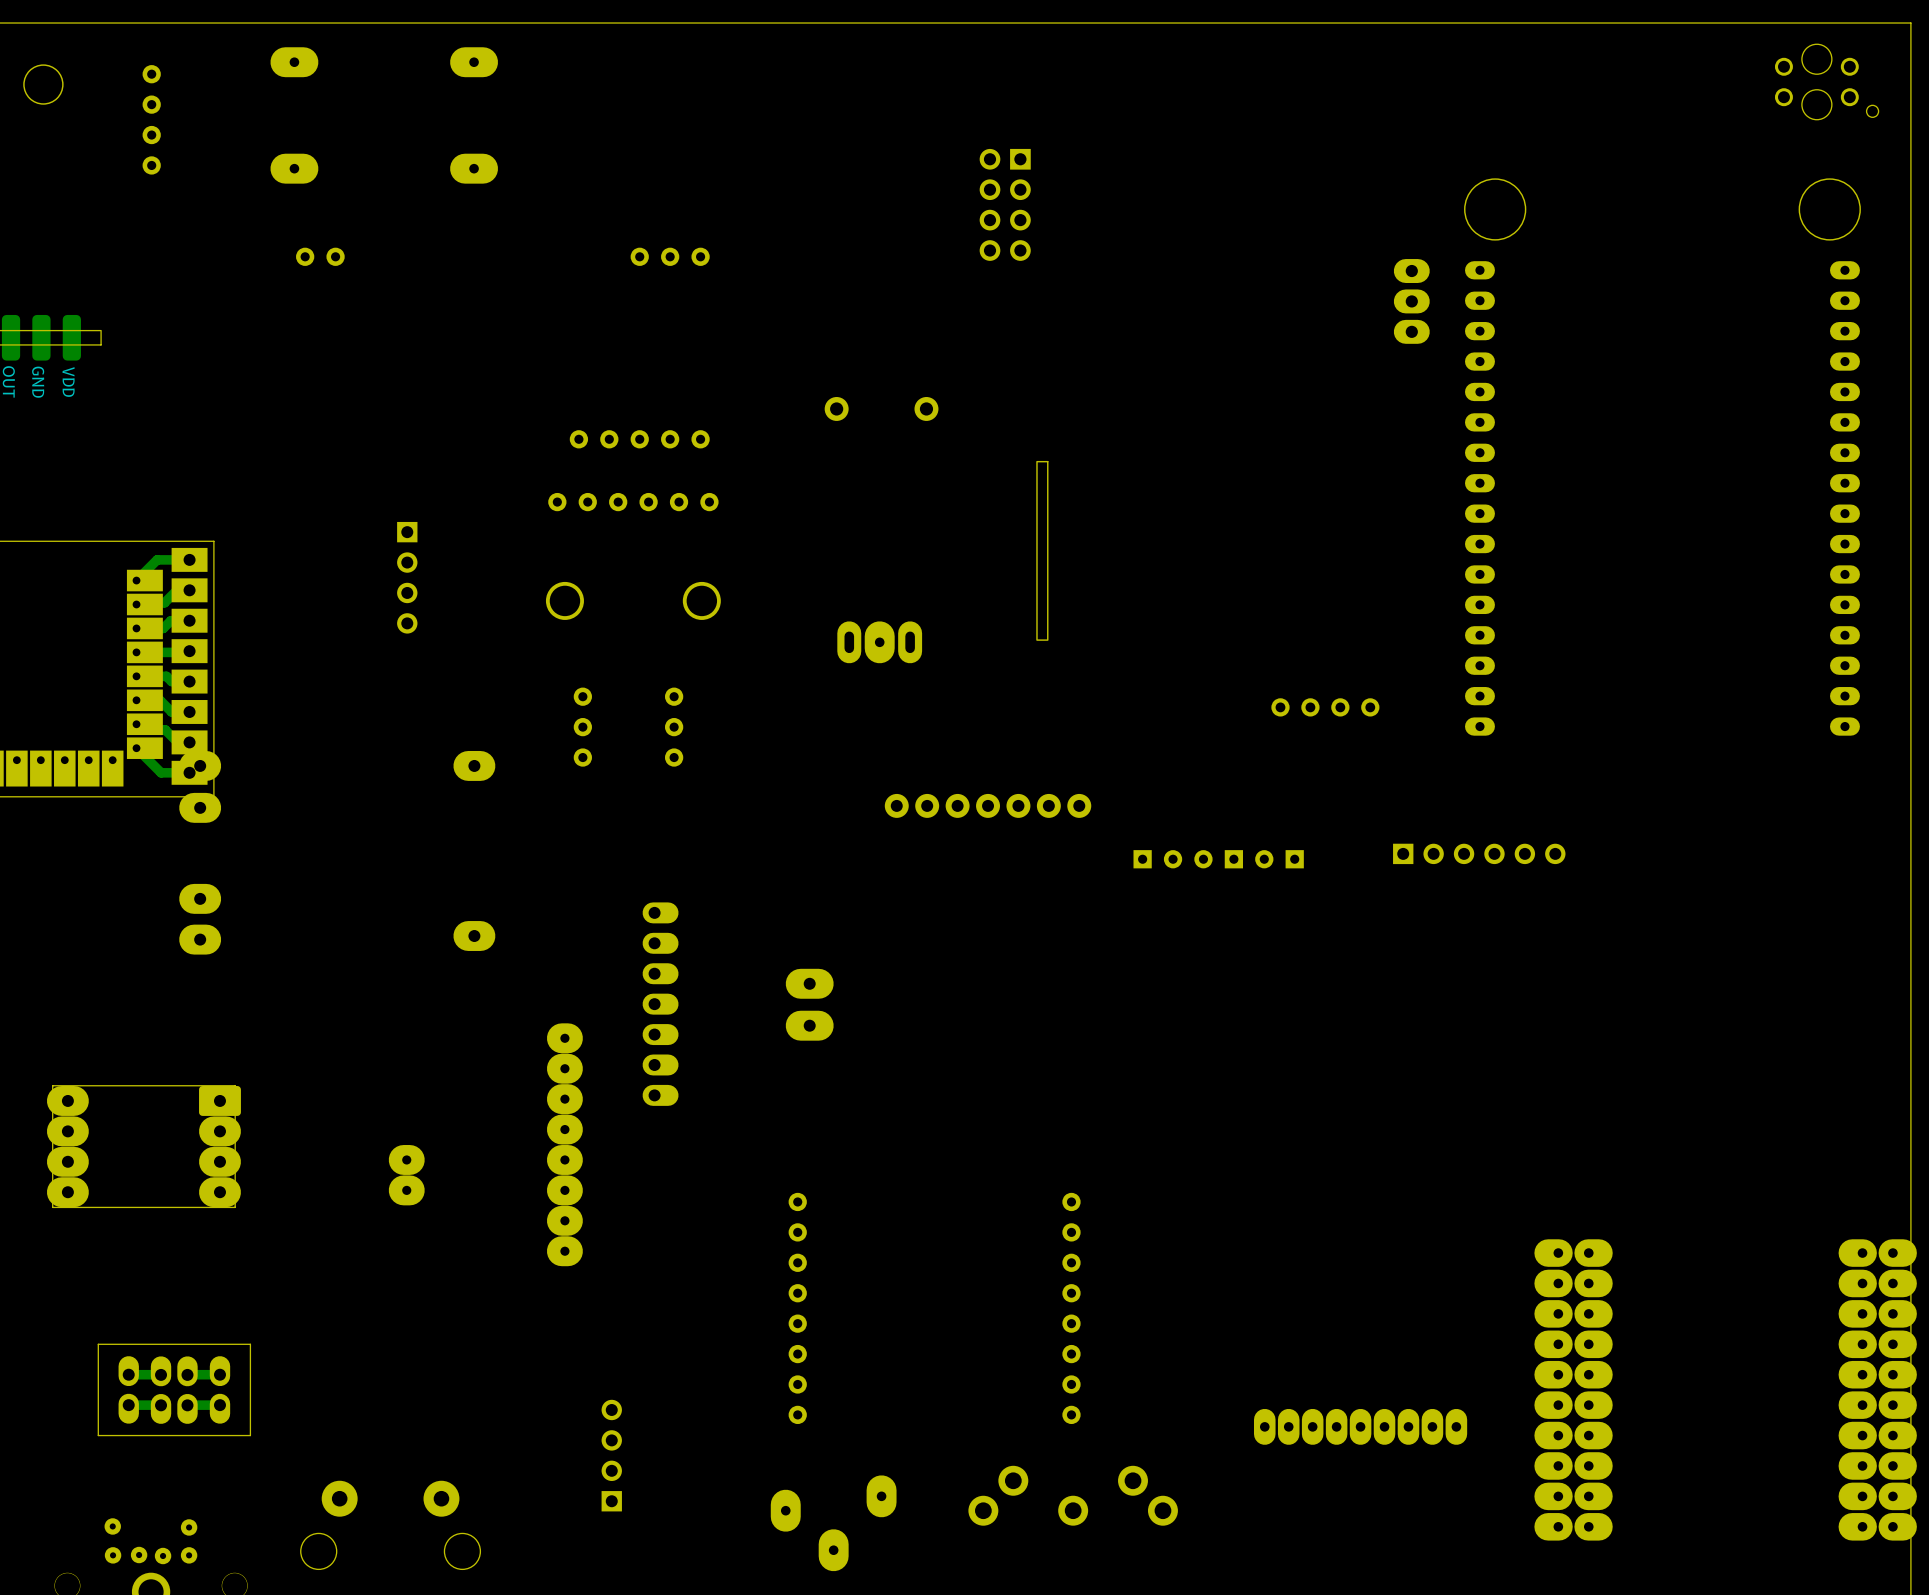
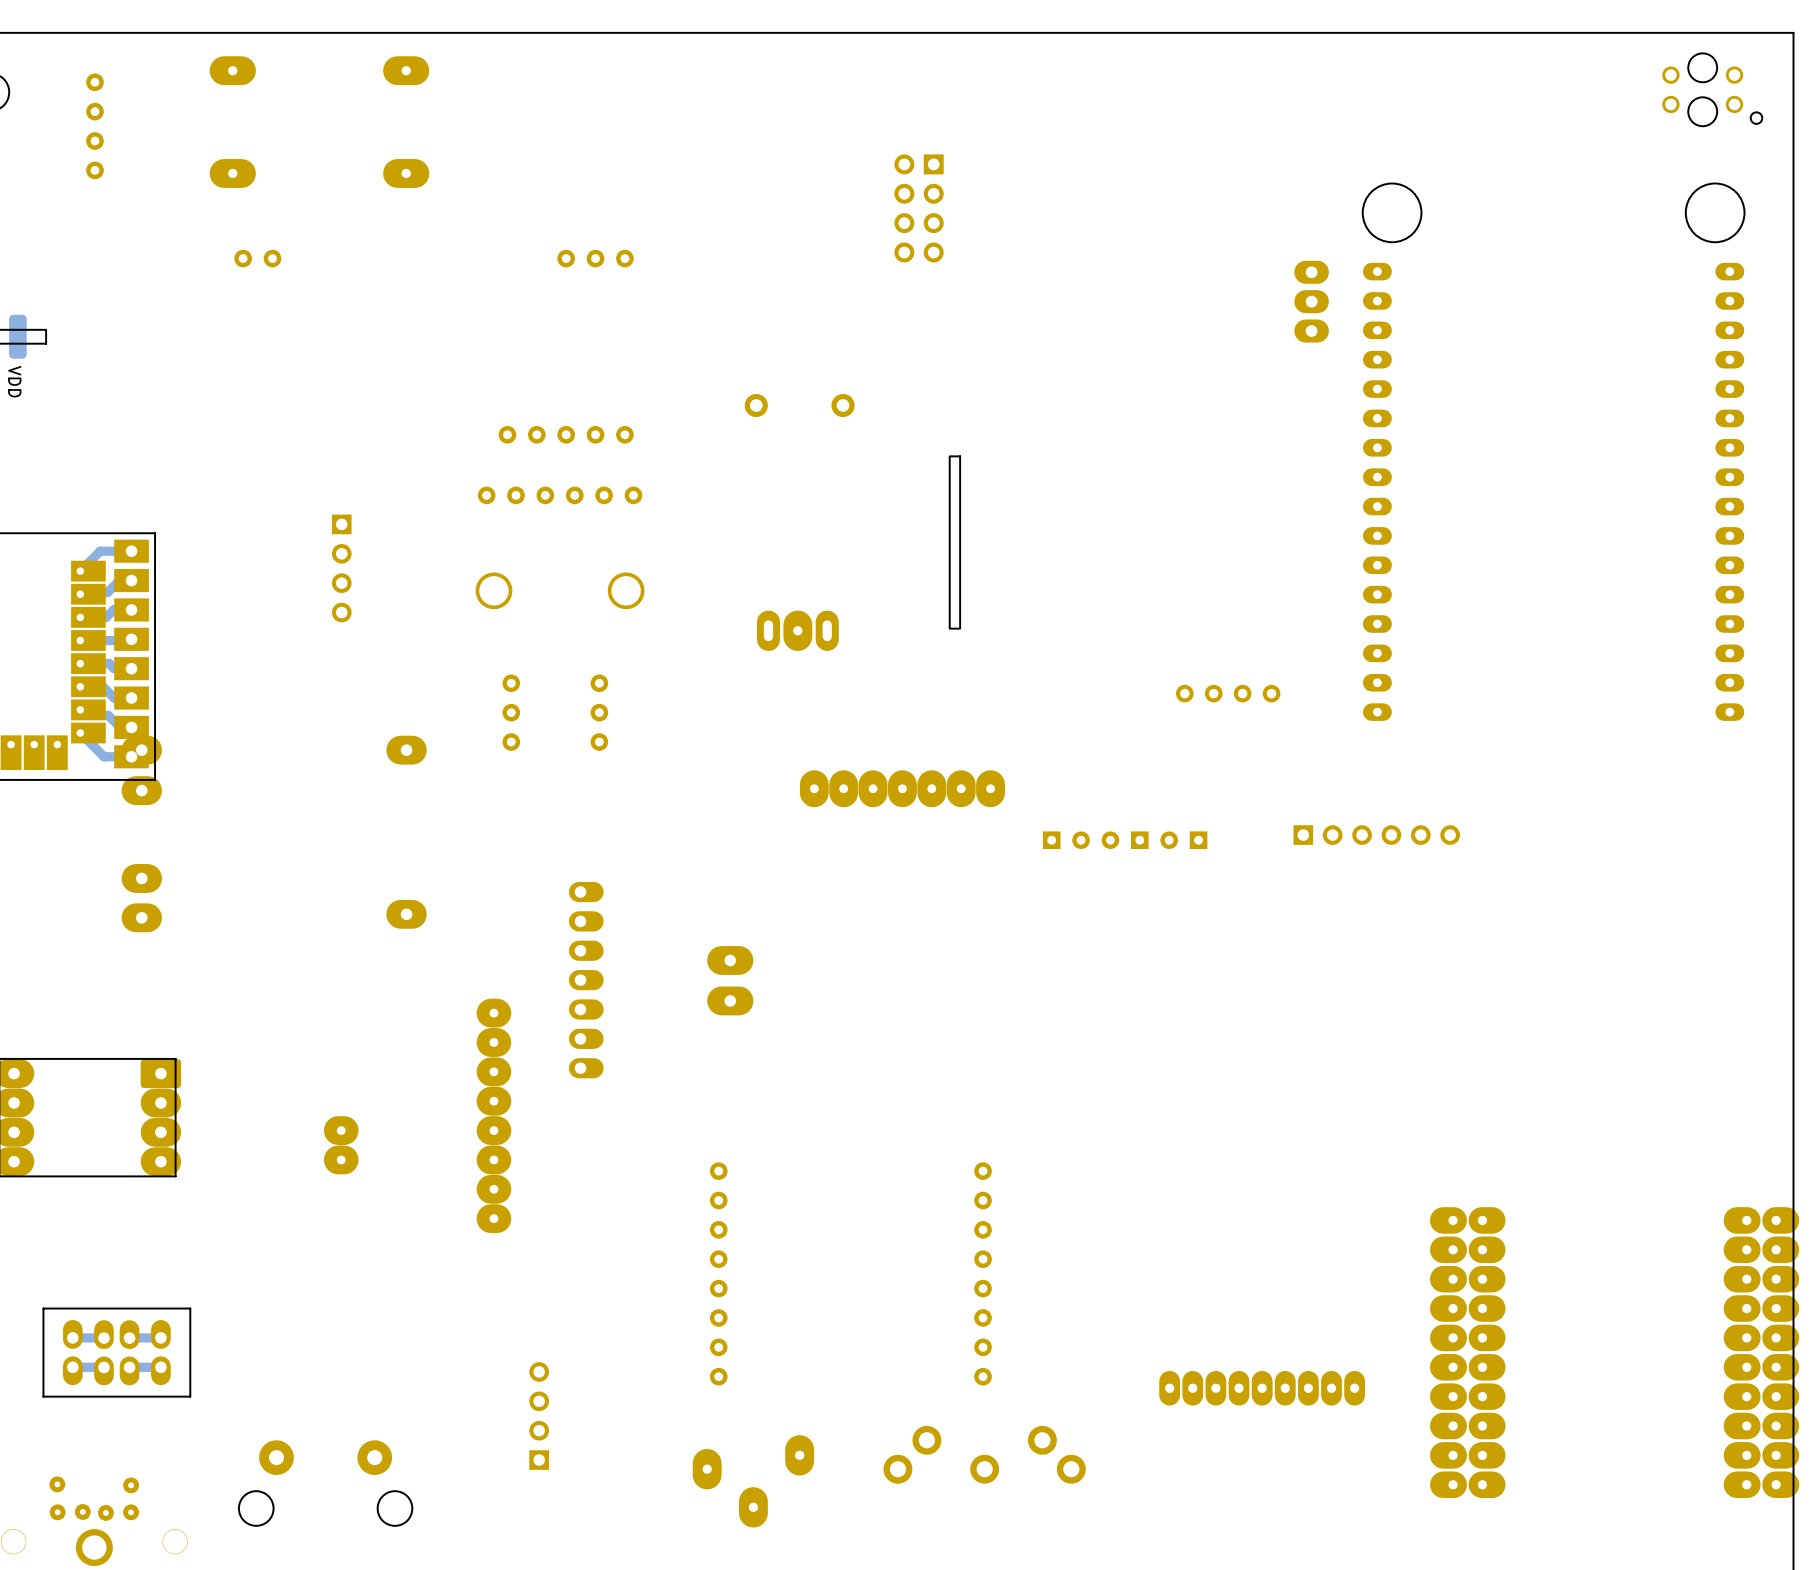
part footprint: [884, 793, 1092, 818] -> [799, 770, 1006, 808]

